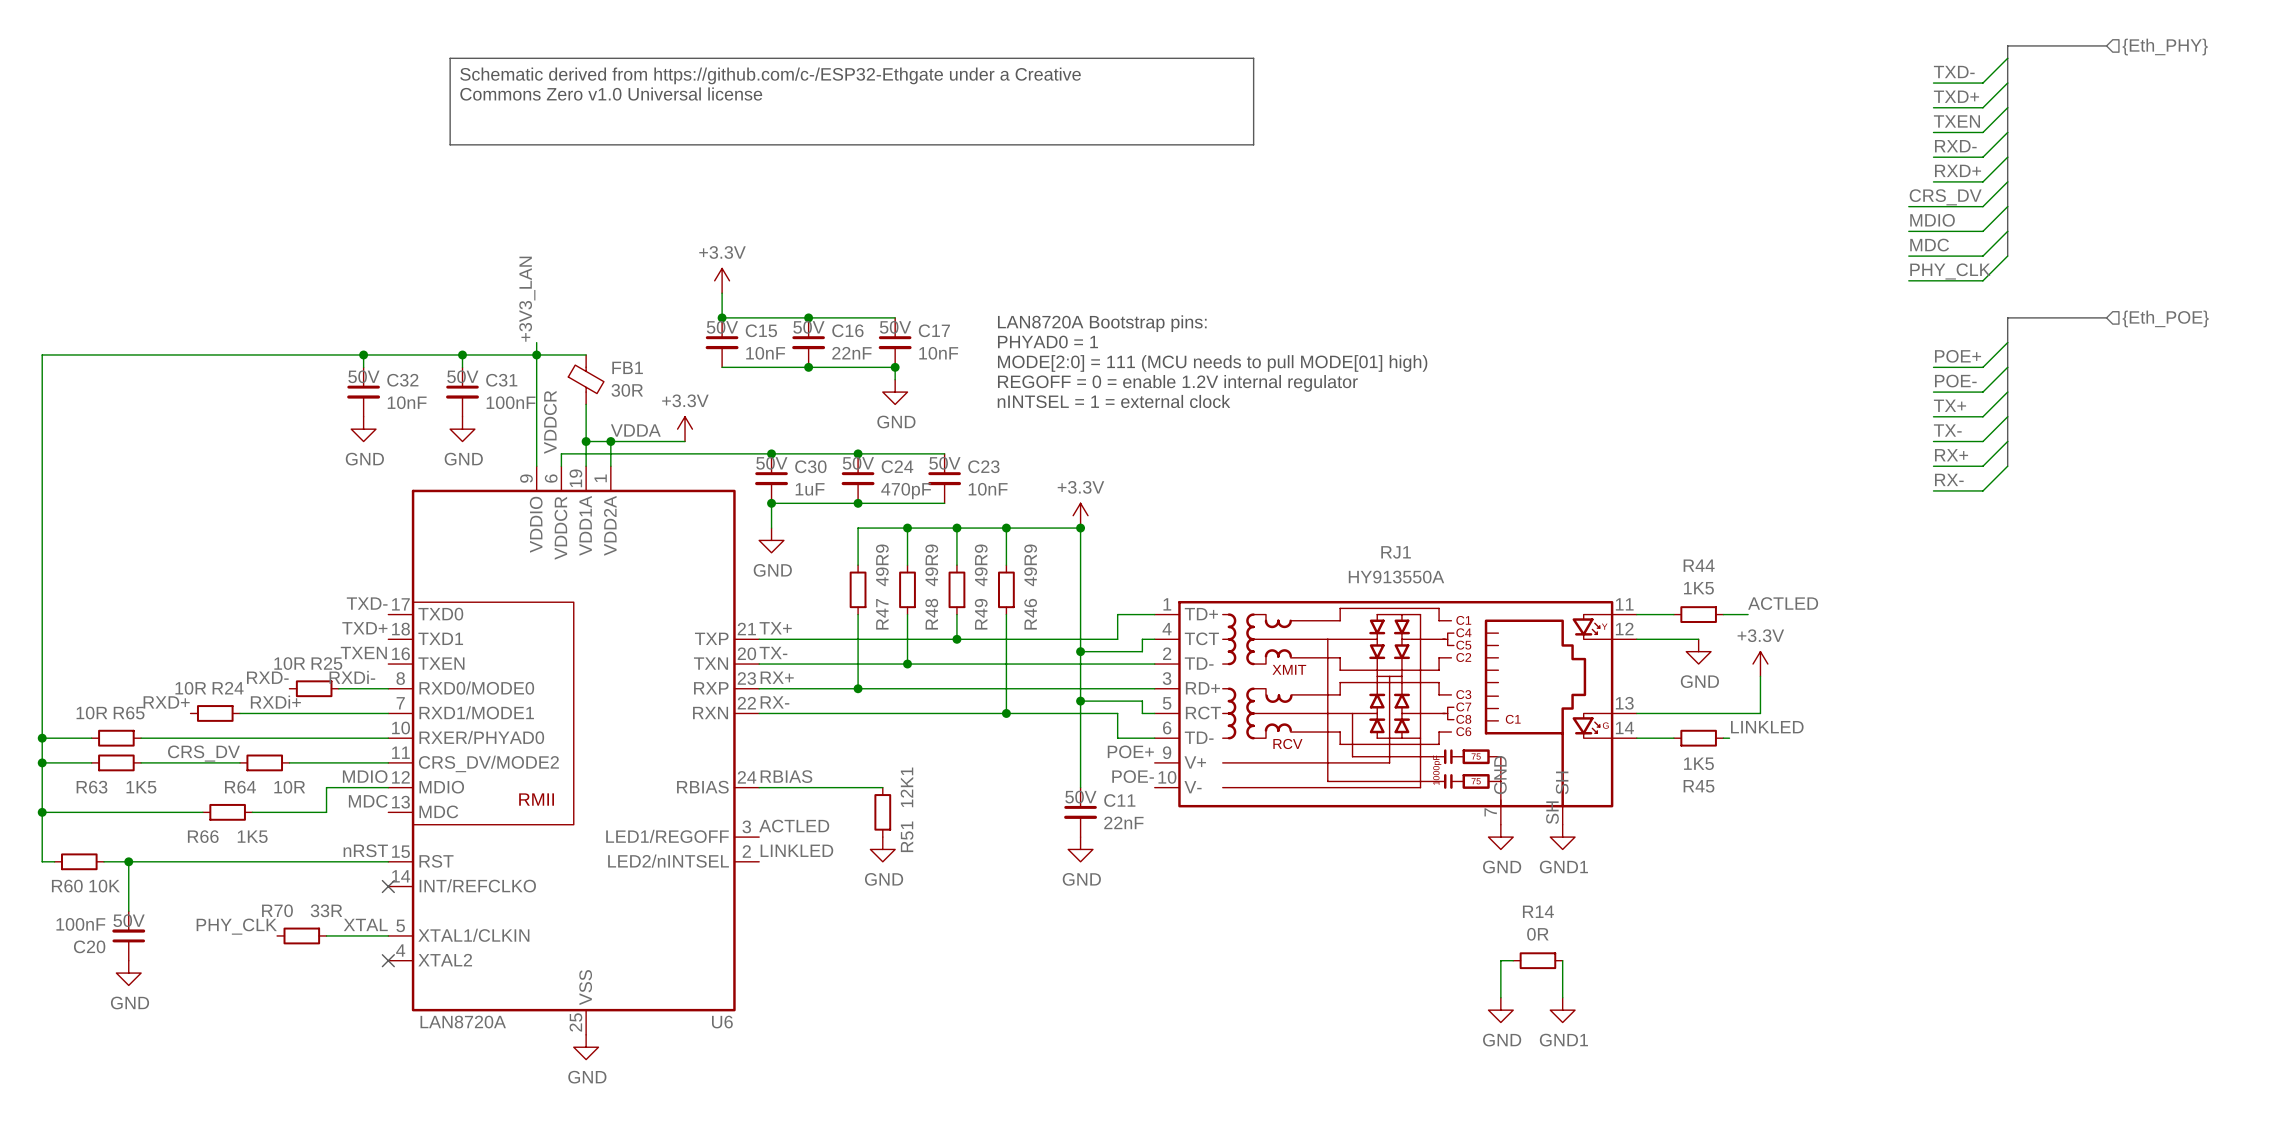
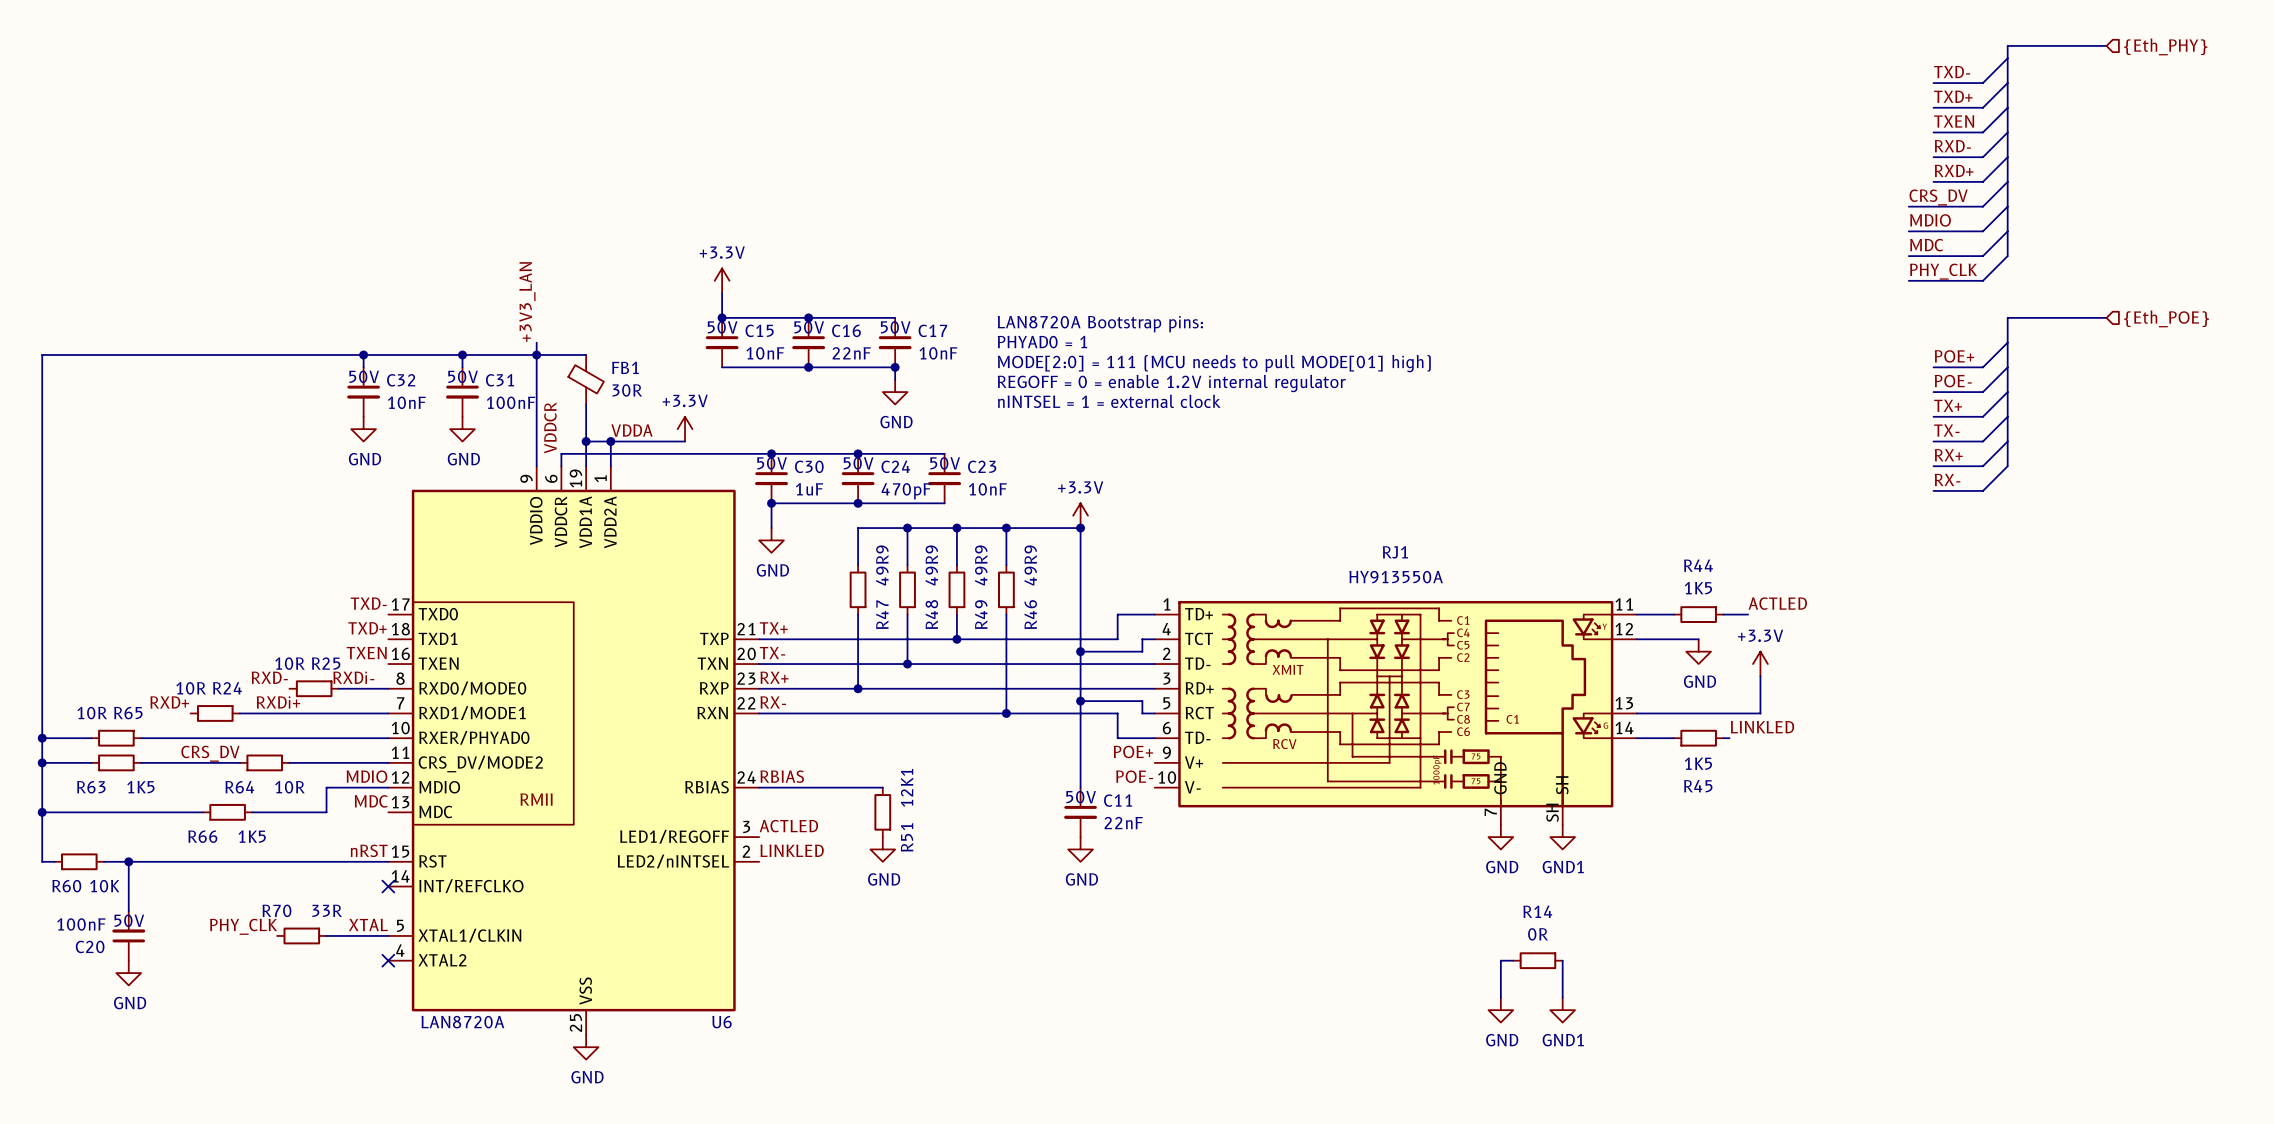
line: (450, 58) (1253, 58) (1253, 144) (450, 144) (450, 58) -> none
text: Schematic derived from https://github.com/c-/ESP32-Ethgate under a Creative (770, 75) -> none
text: Commons Zero v1.0 Universal license (611, 94) -> none

